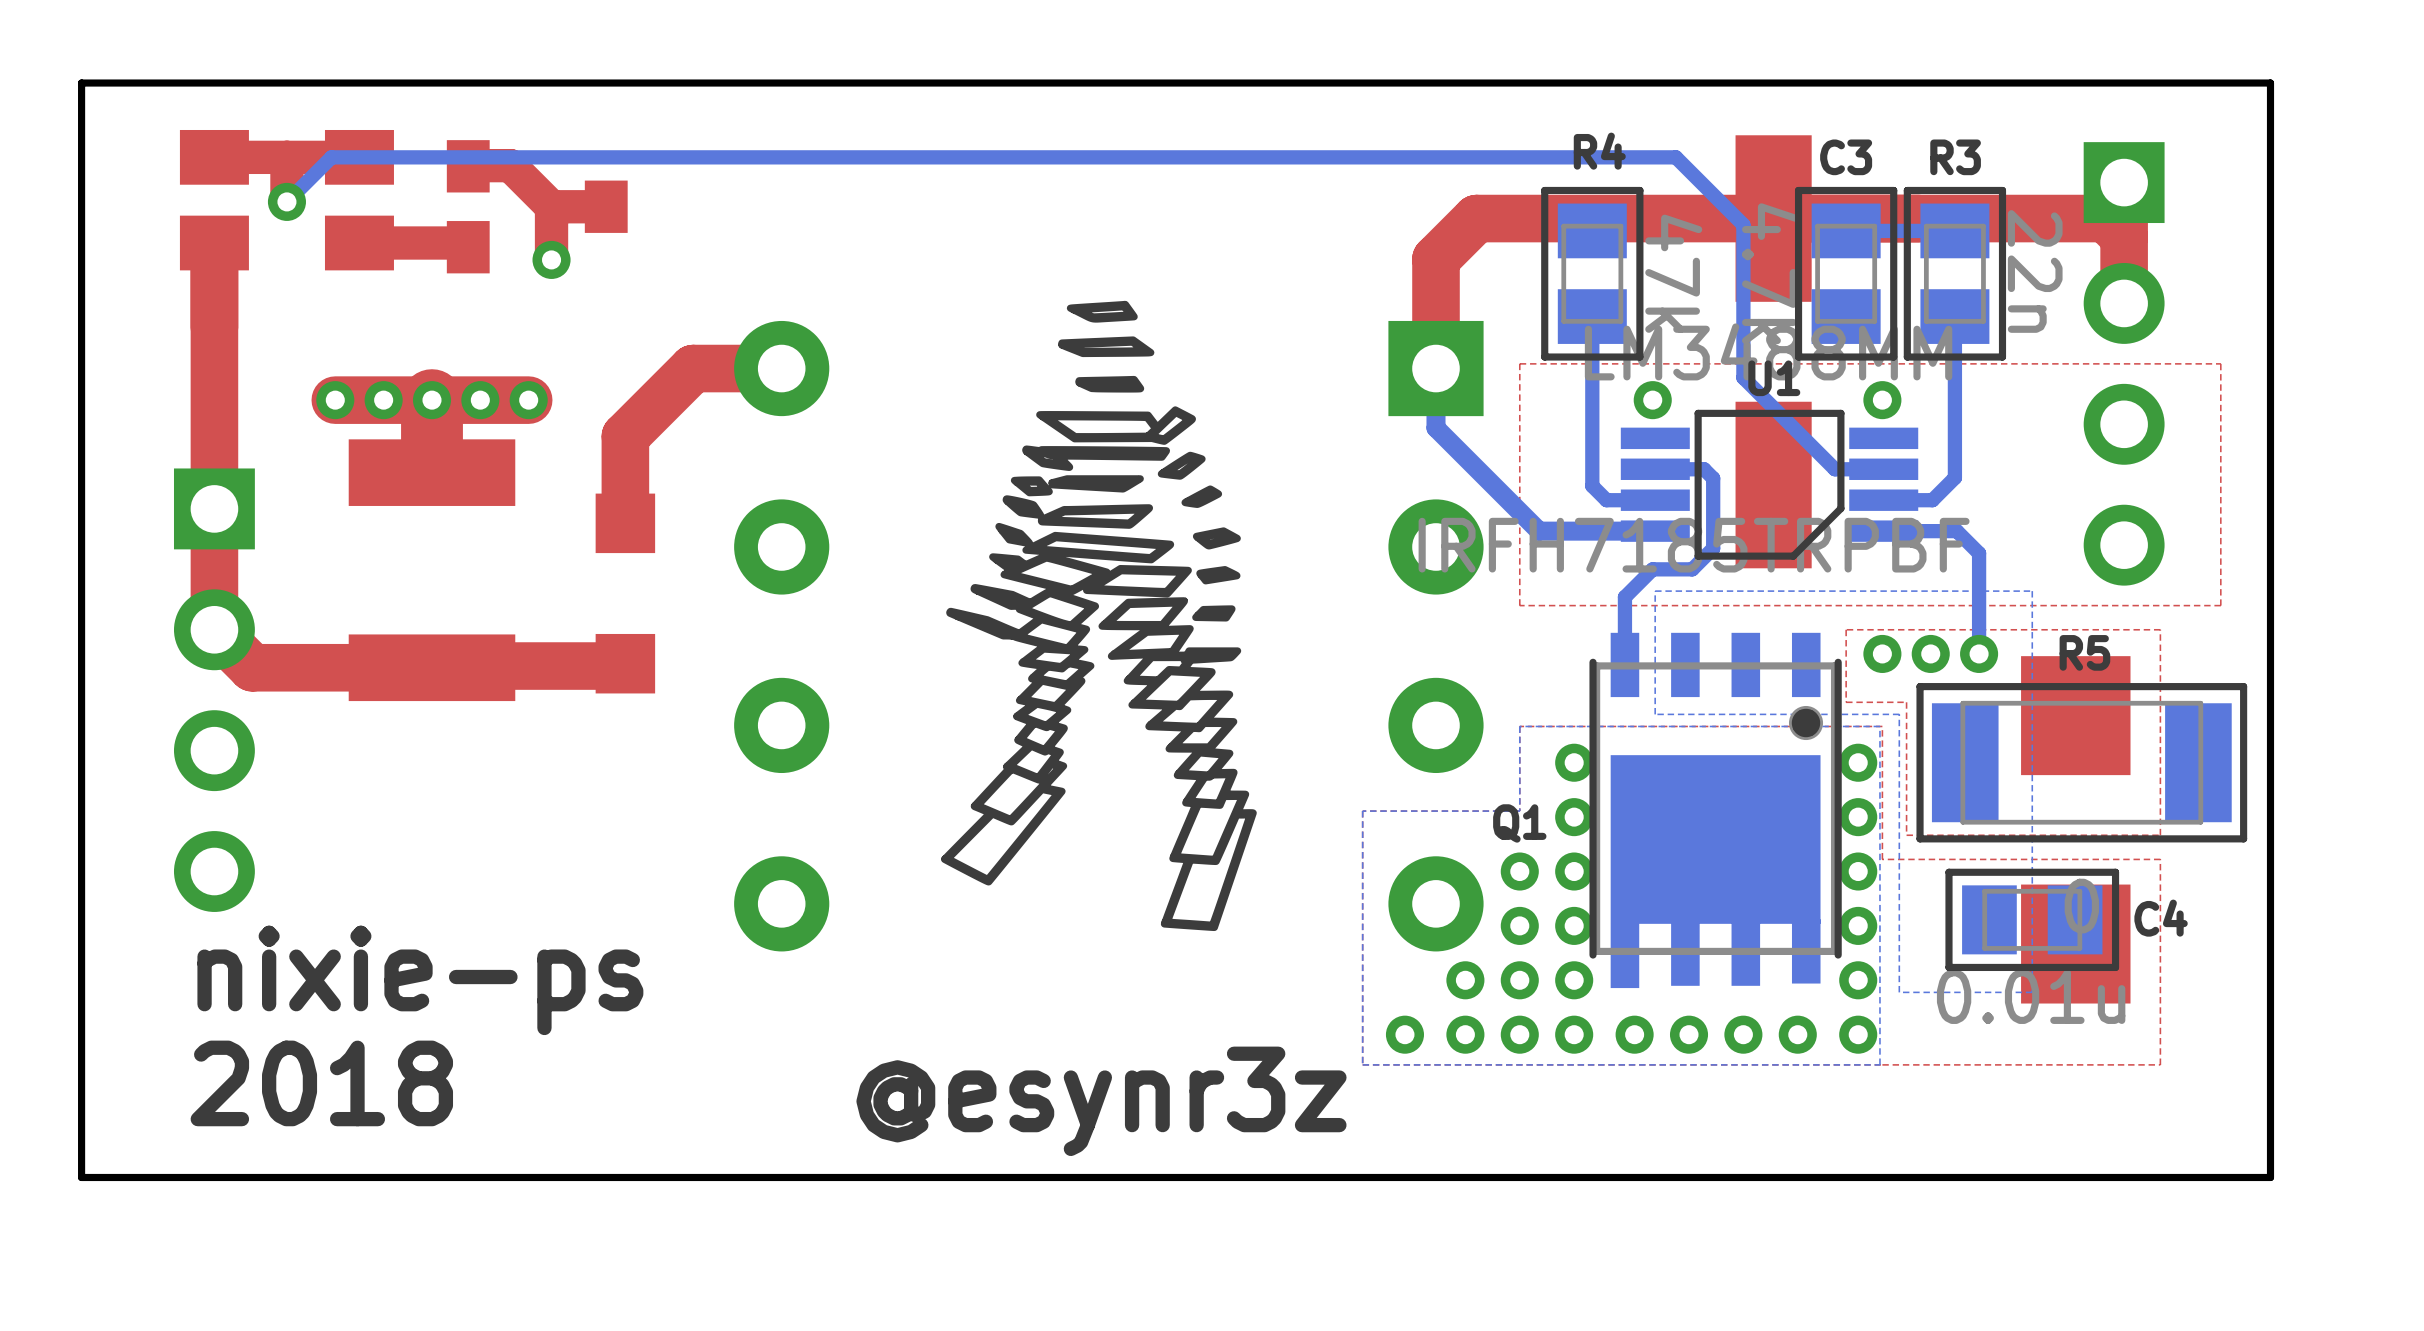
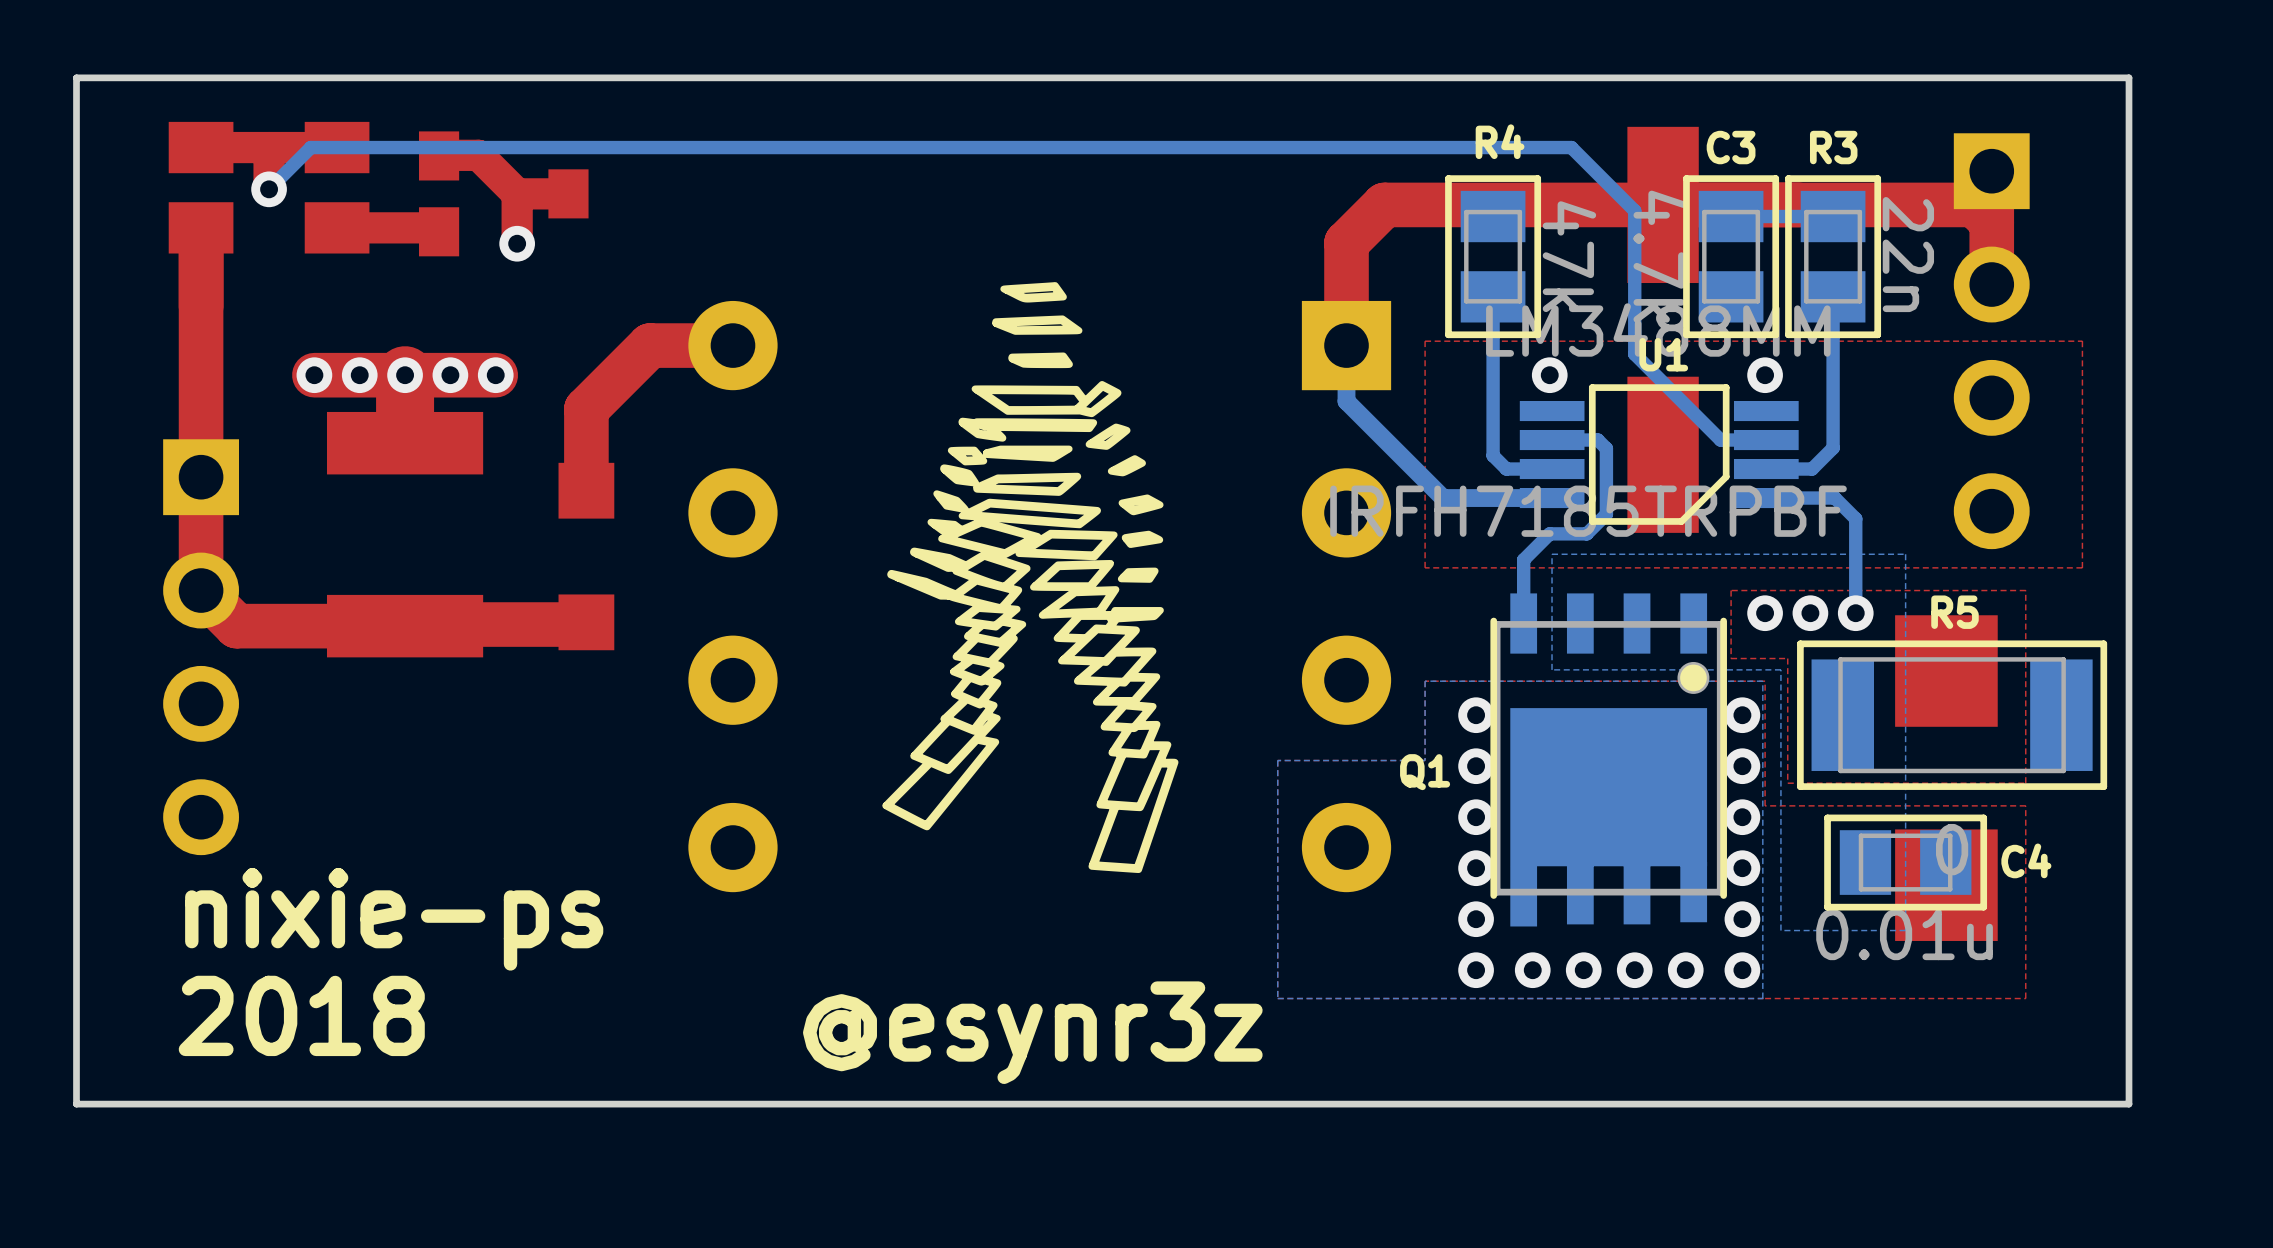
via: (1519, 871) -> none
via: (1519, 925) -> none
via: (1465, 980) -> none
via: (1519, 980) -> none
via: (1404, 1034) -> none
via: (1465, 1034) -> none
via: (1519, 1034) -> none

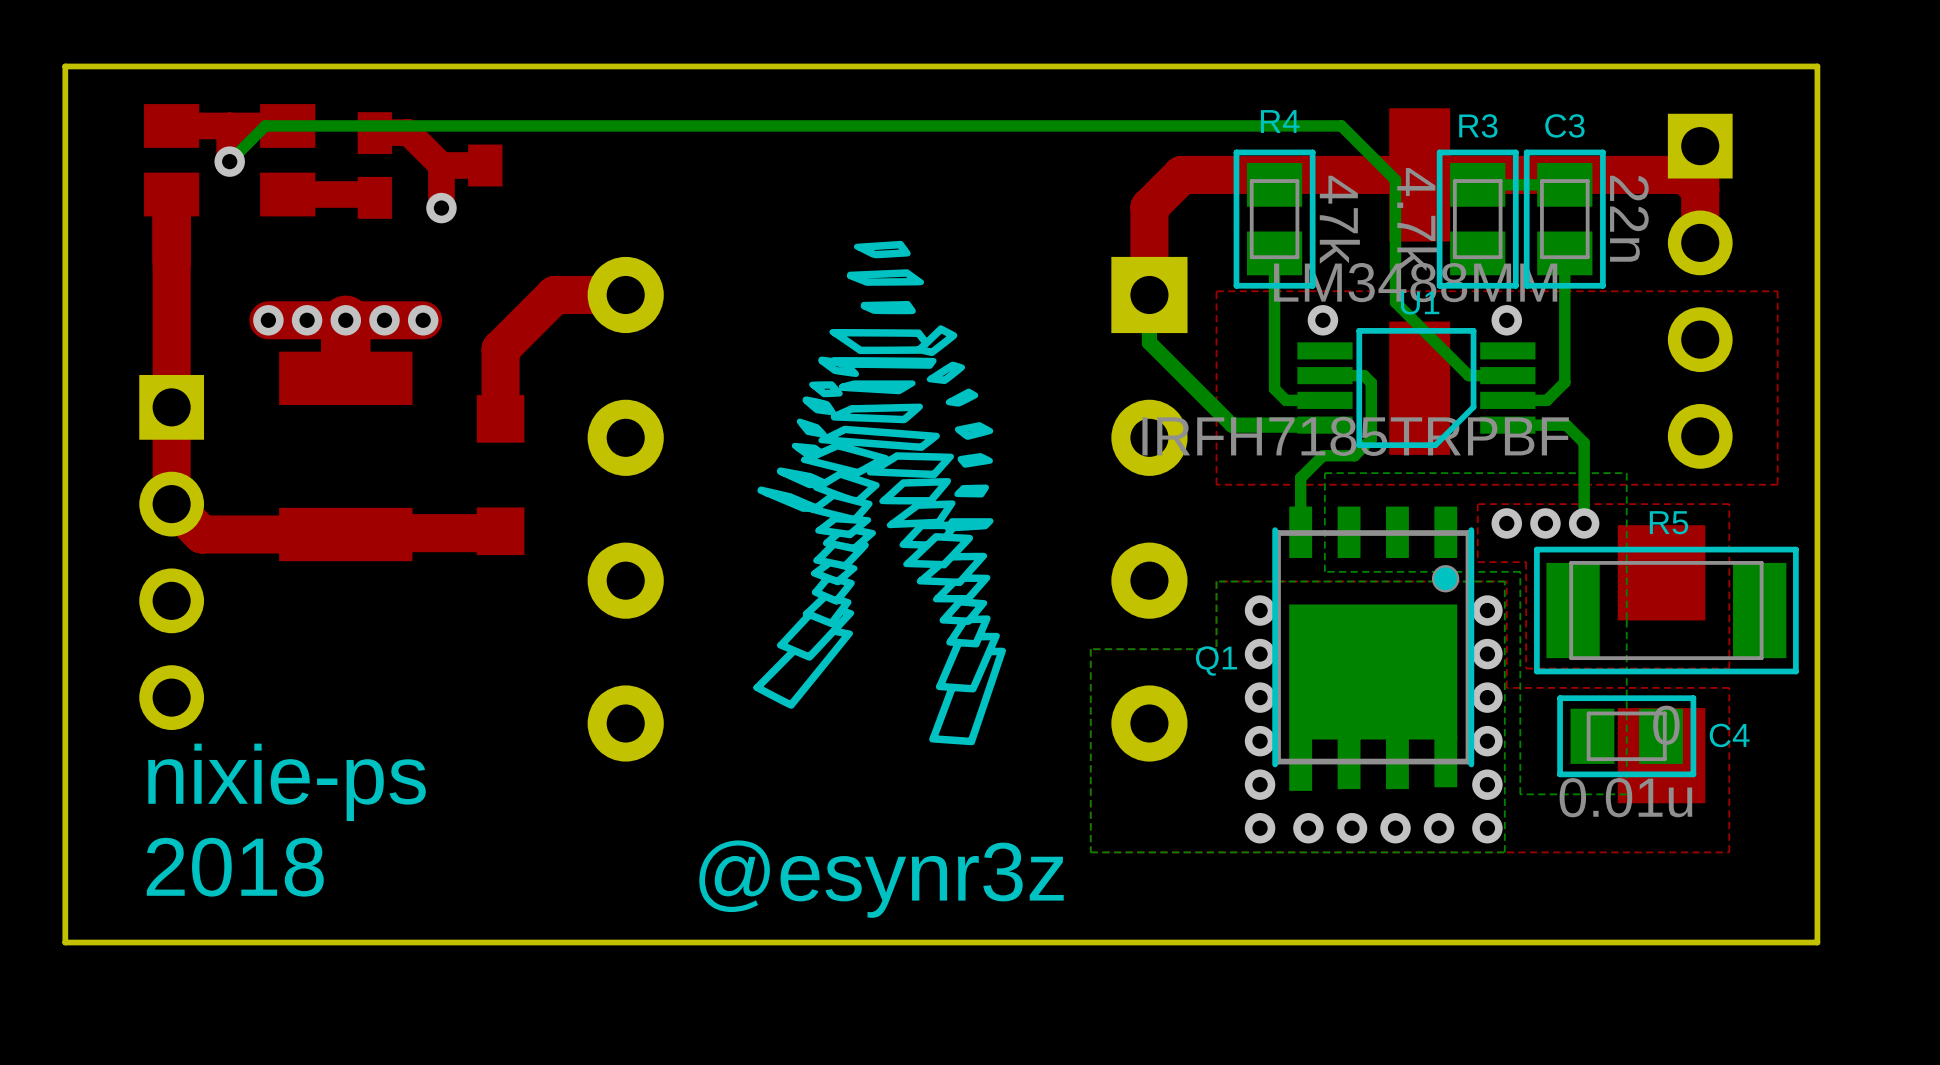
C3 name position: C3 (1731, 147) -> C3 (1564, 125)
R3 name position: R3 (1833, 147) -> R3 (1478, 125)

